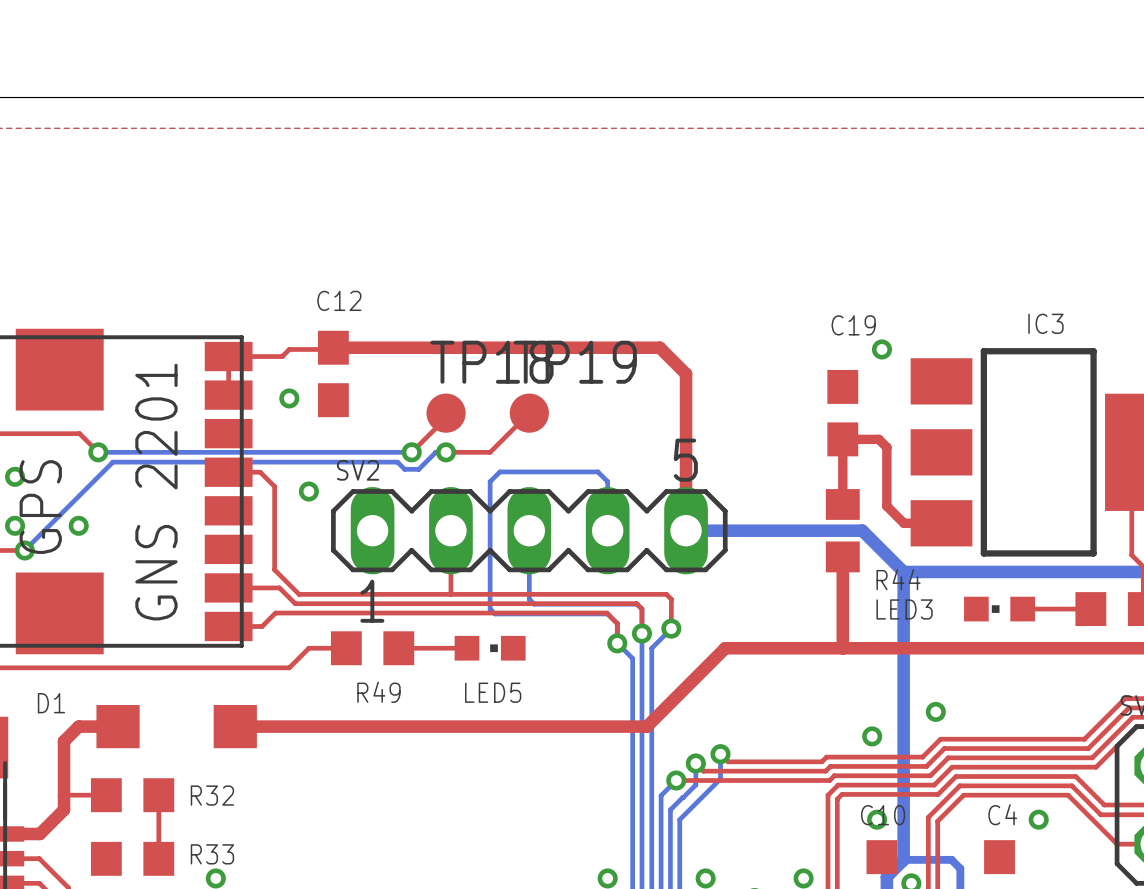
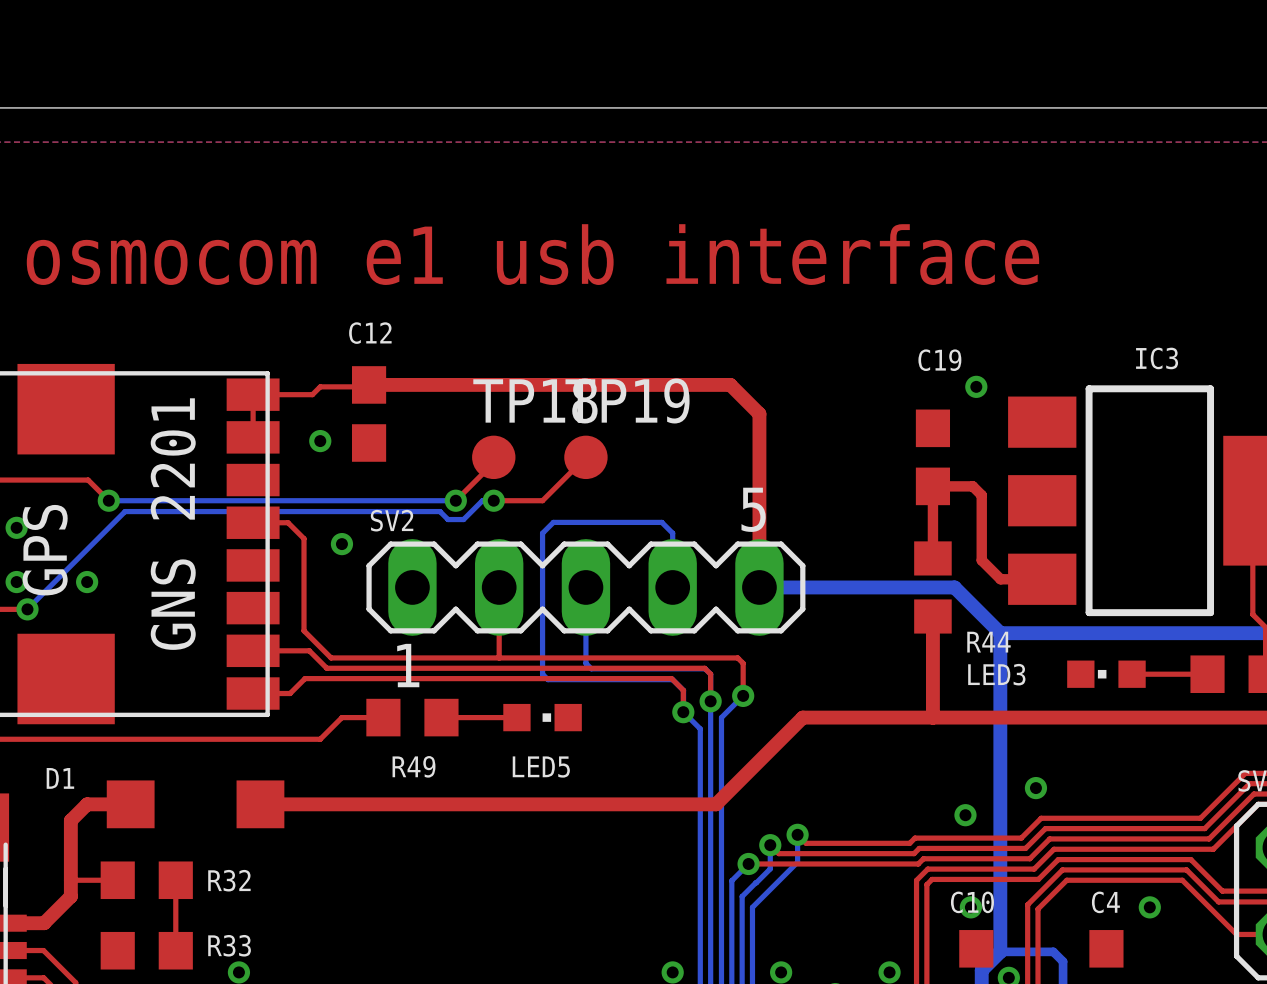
text: none -> osmocom e1 usb interface (532, 254)

